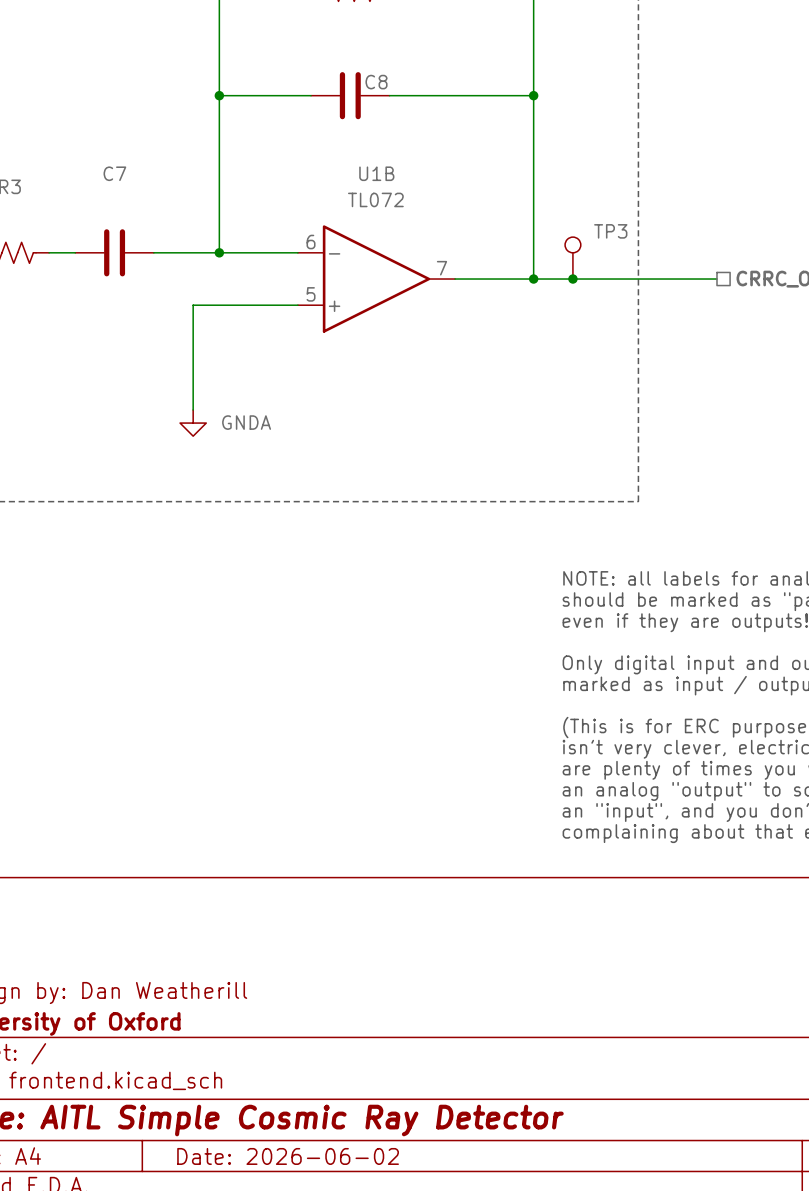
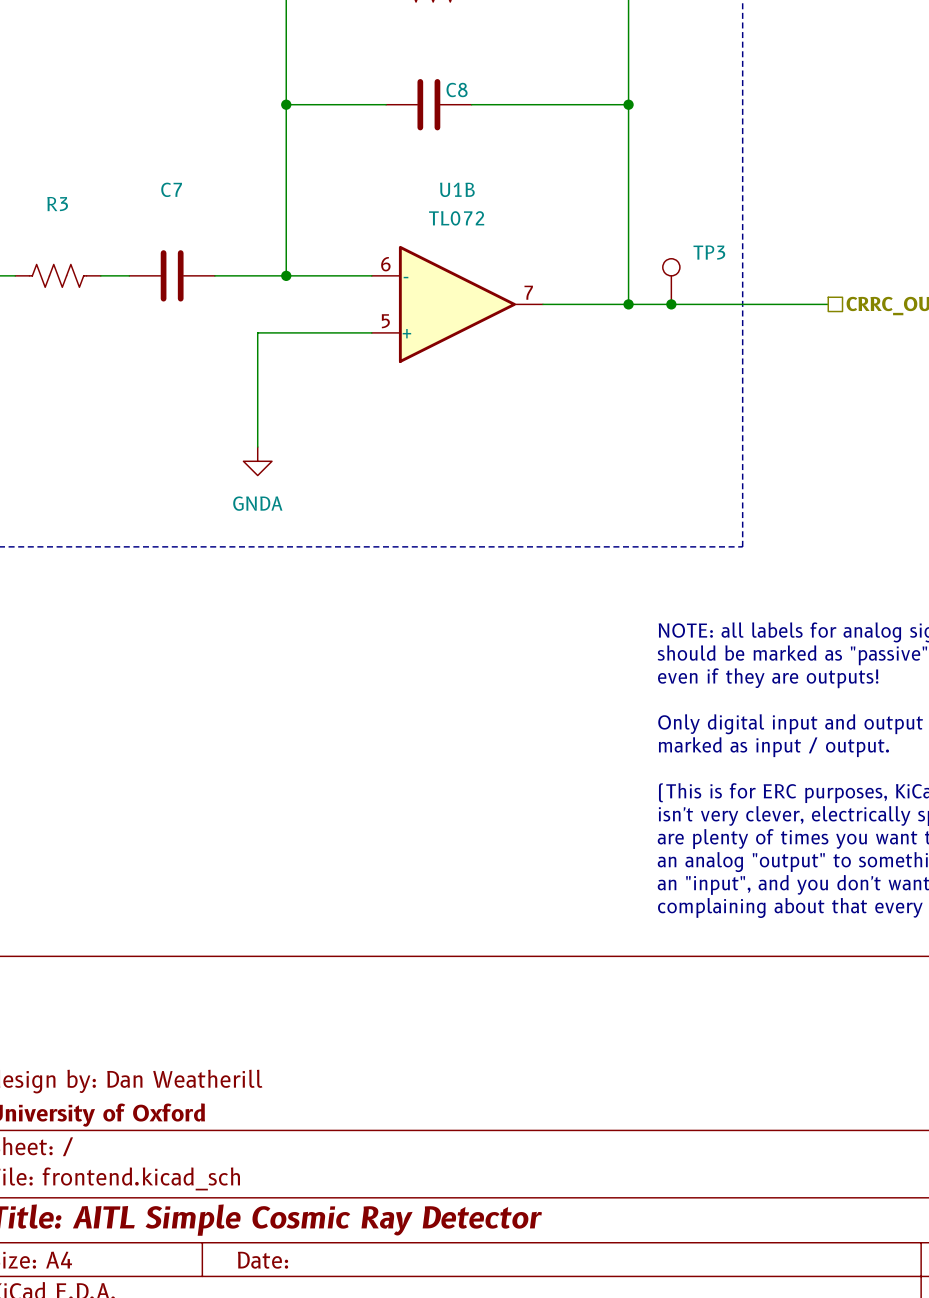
power symbol text position: GNDA (246, 422) -> GNDA (257, 503)
title block: Date: 2026-06-02 (288, 1156) -> Date: (263, 1260)

